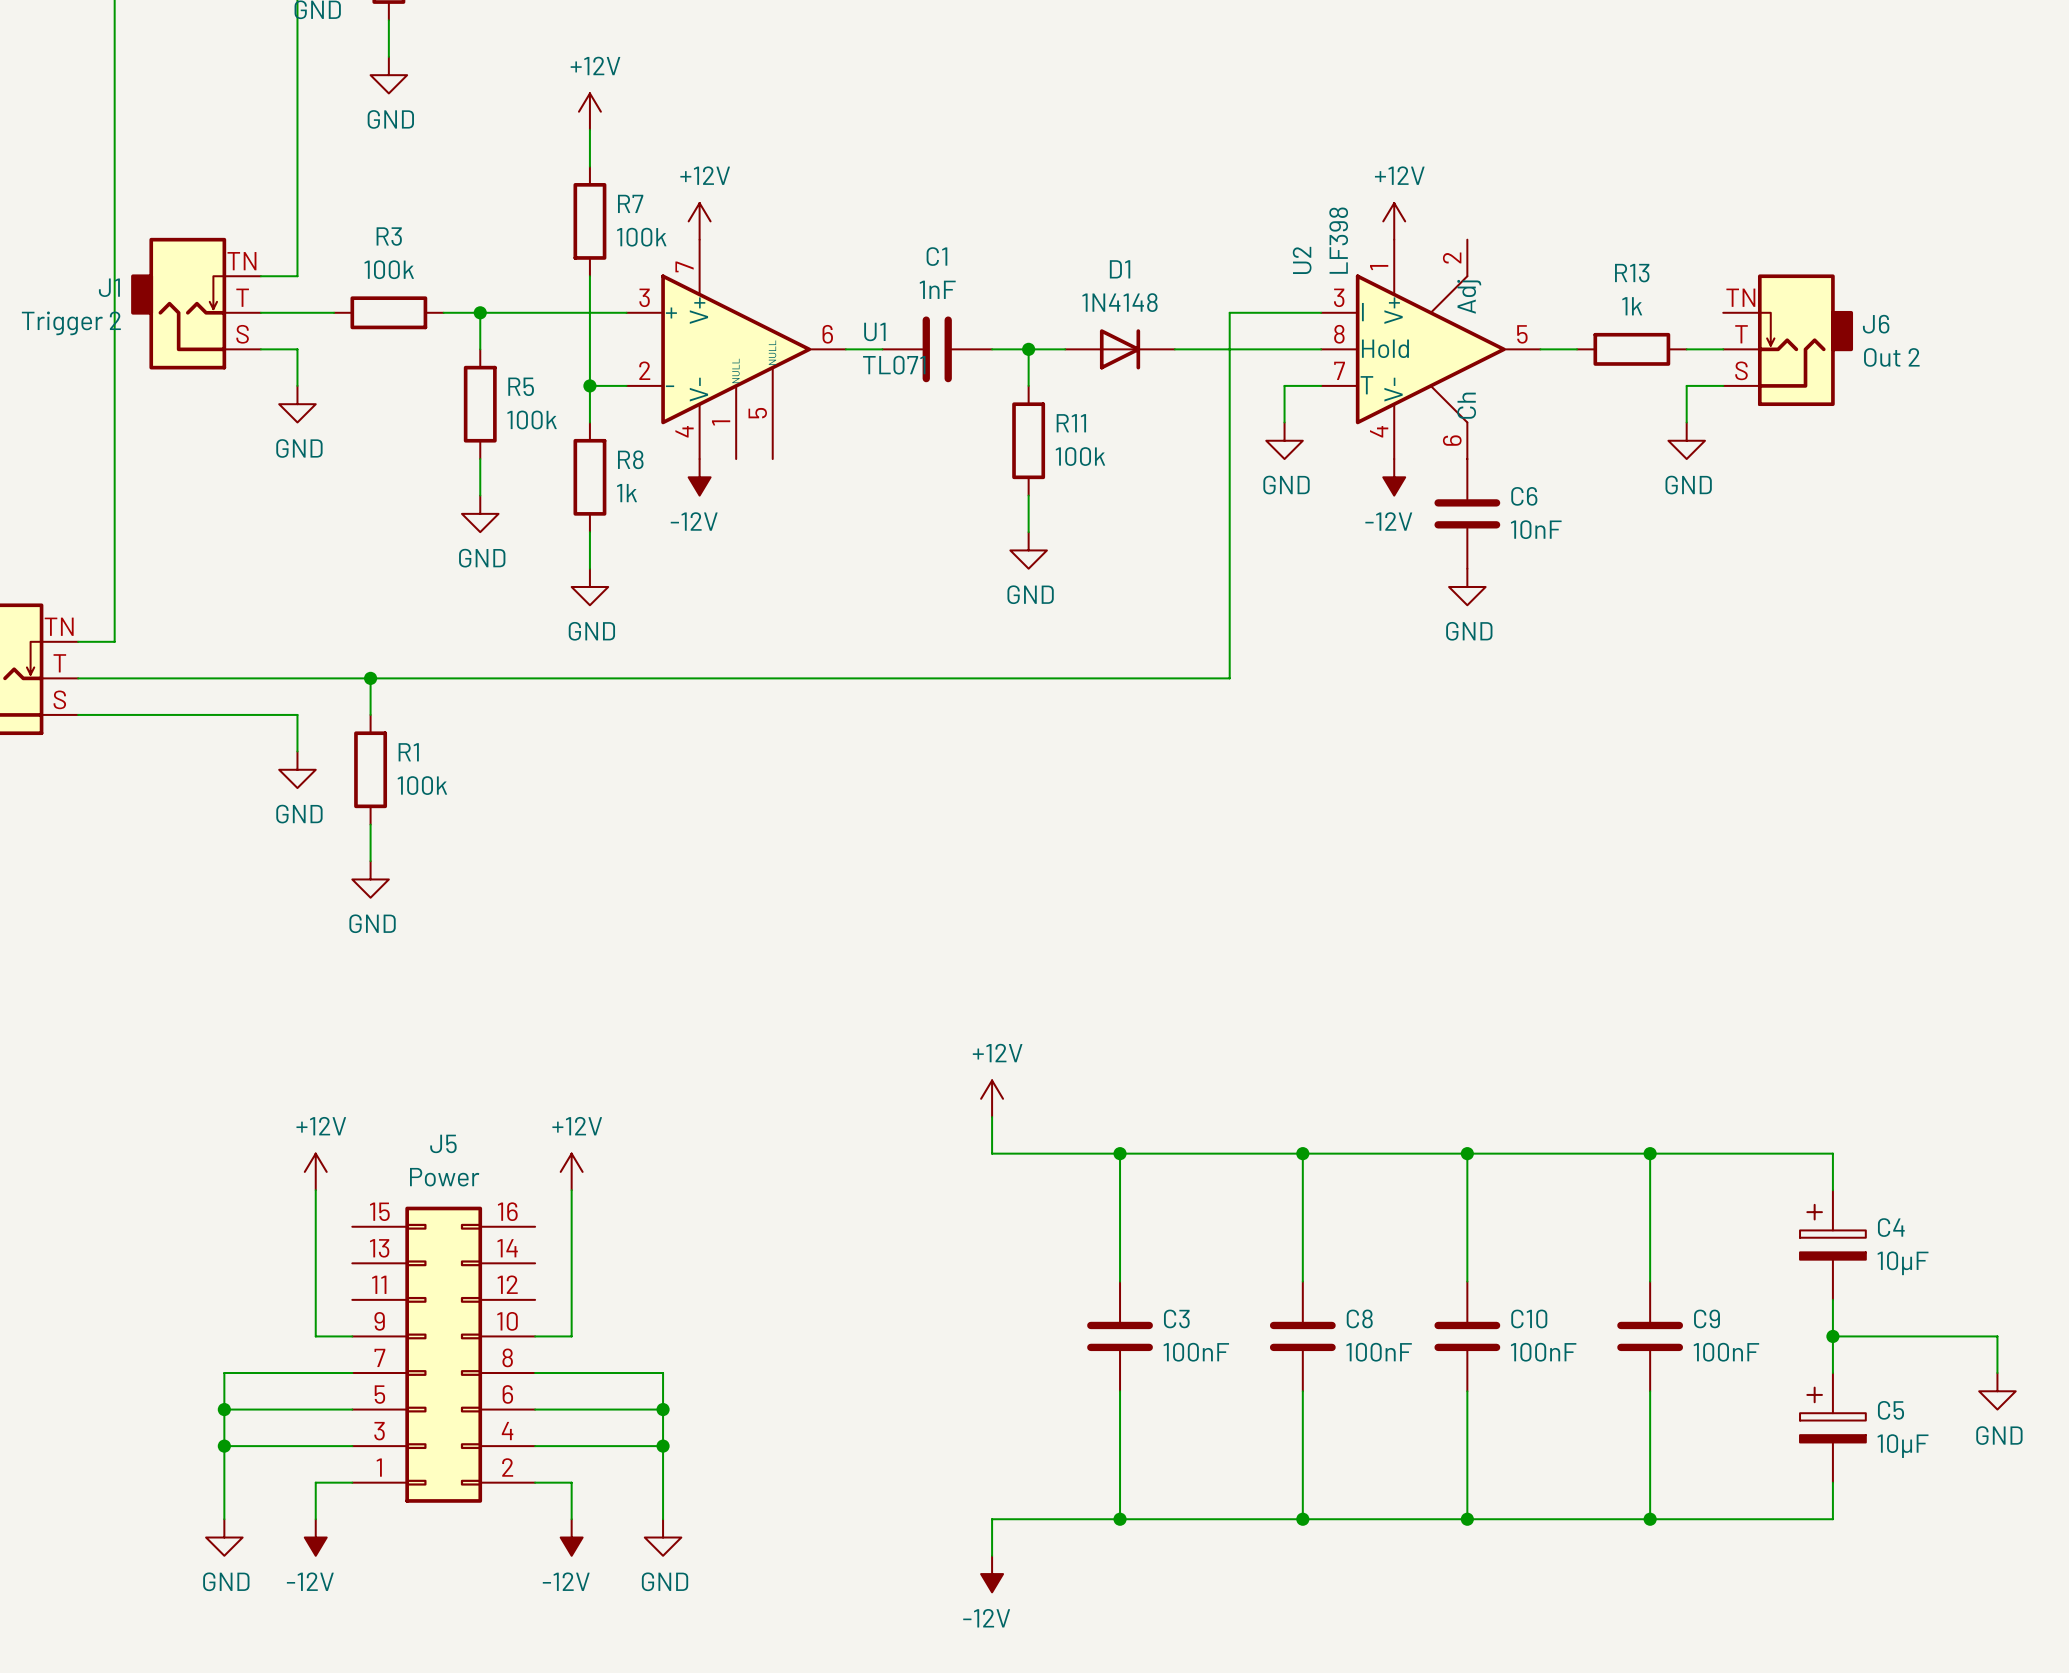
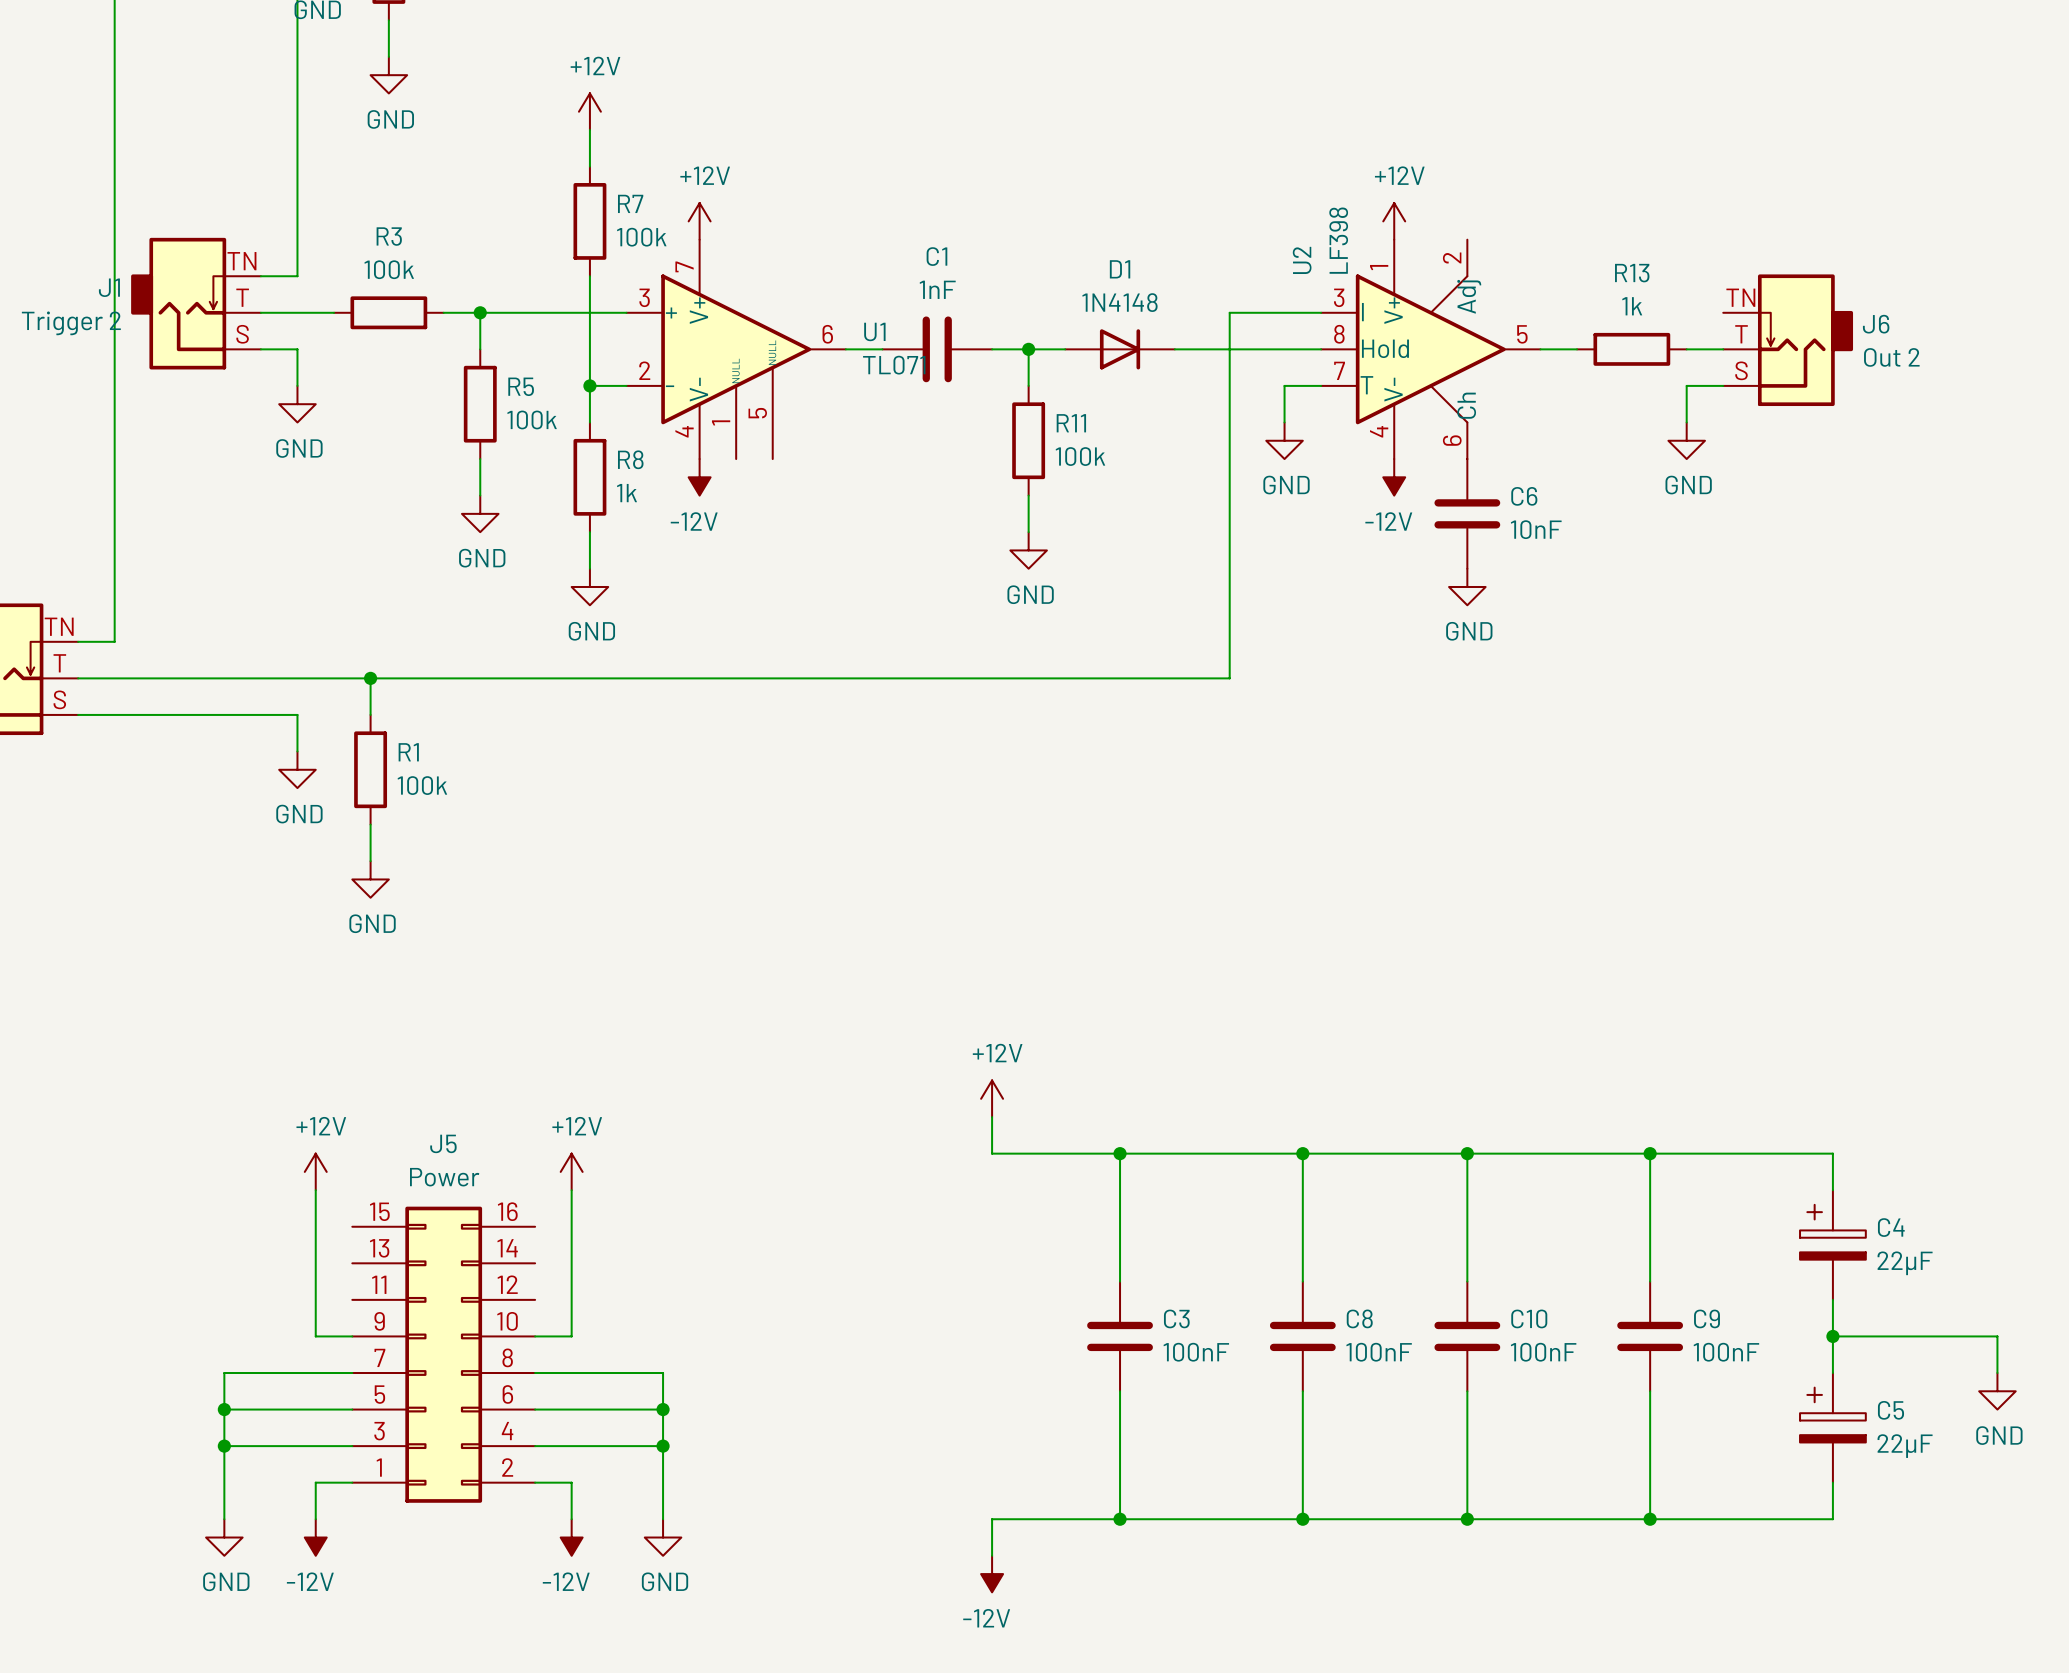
C4 value: 10µF (1903, 1263) -> 22µF (1905, 1263)
C5 value: 10µF (1903, 1446) -> 22µF (1905, 1446)

